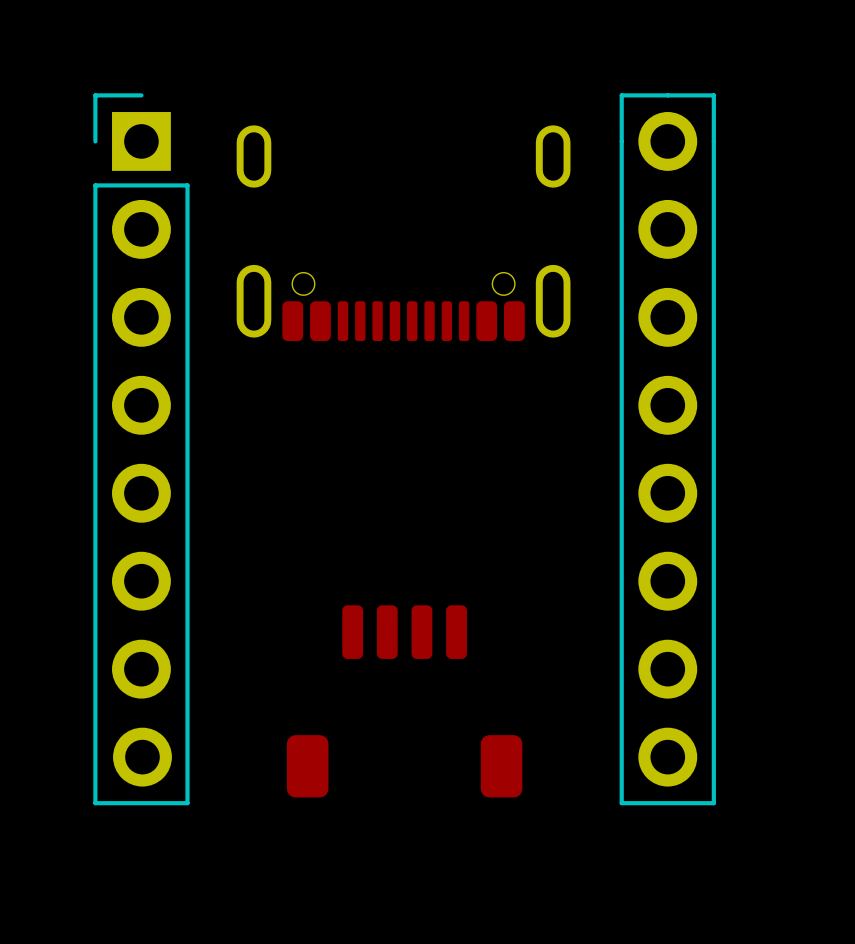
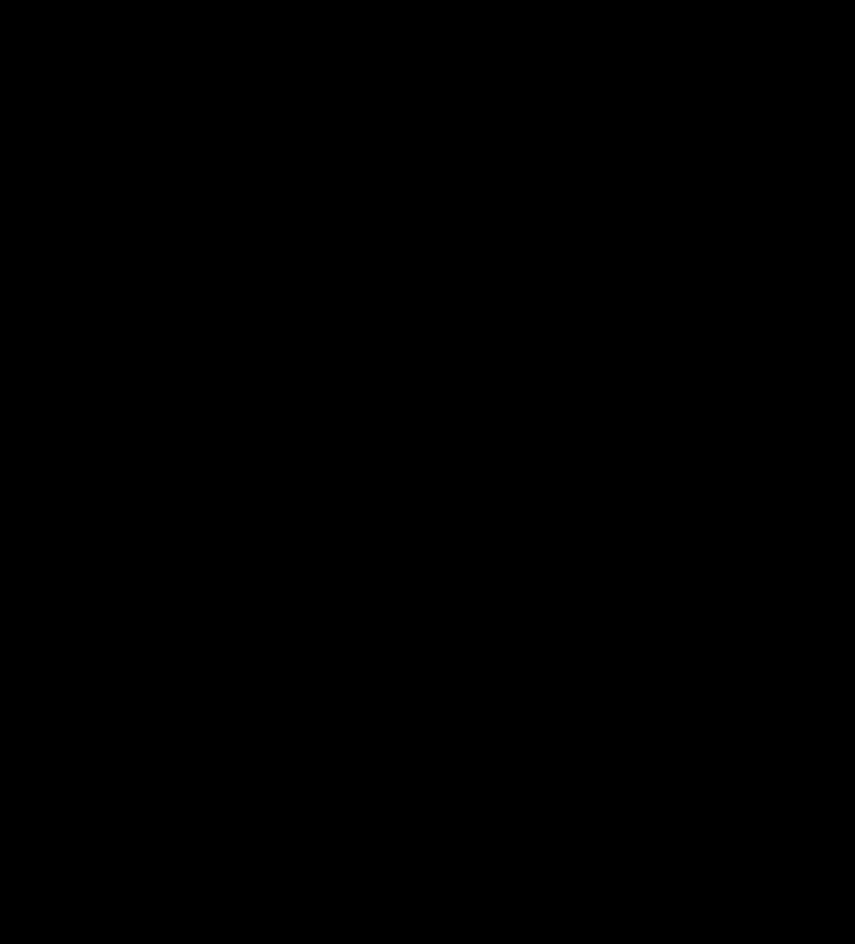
part: (403, 233) -> none
part: (141, 449) -> none
part: (667, 449) -> none
part: (404, 701) -> none

